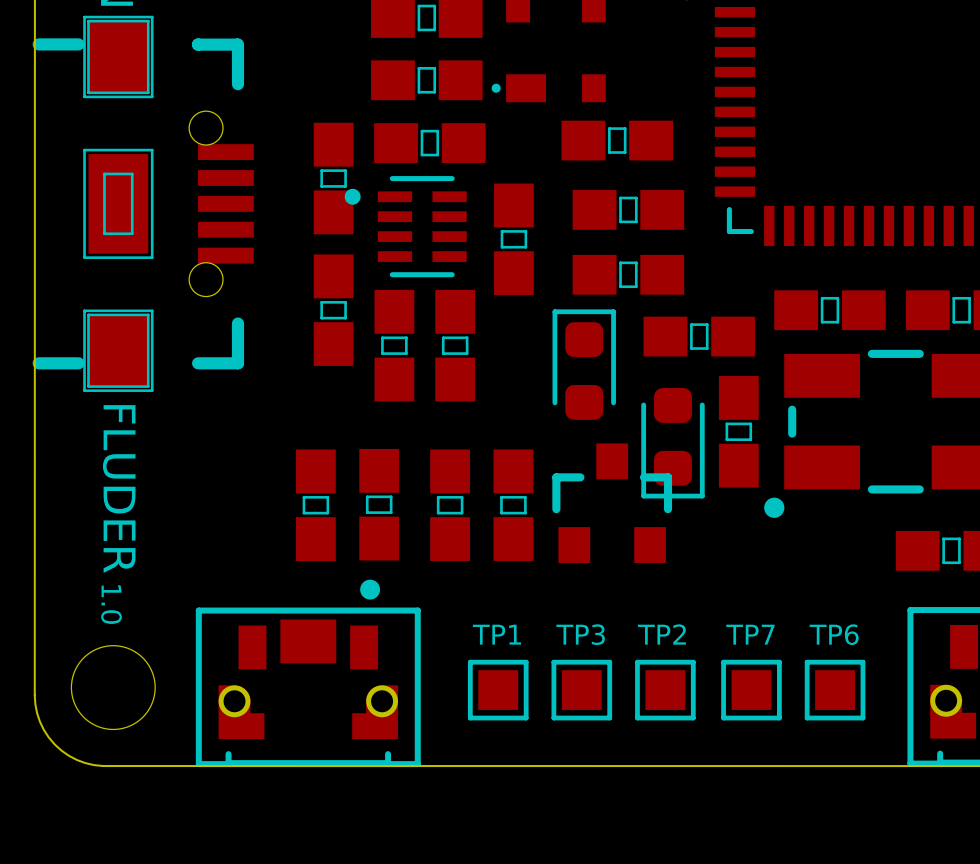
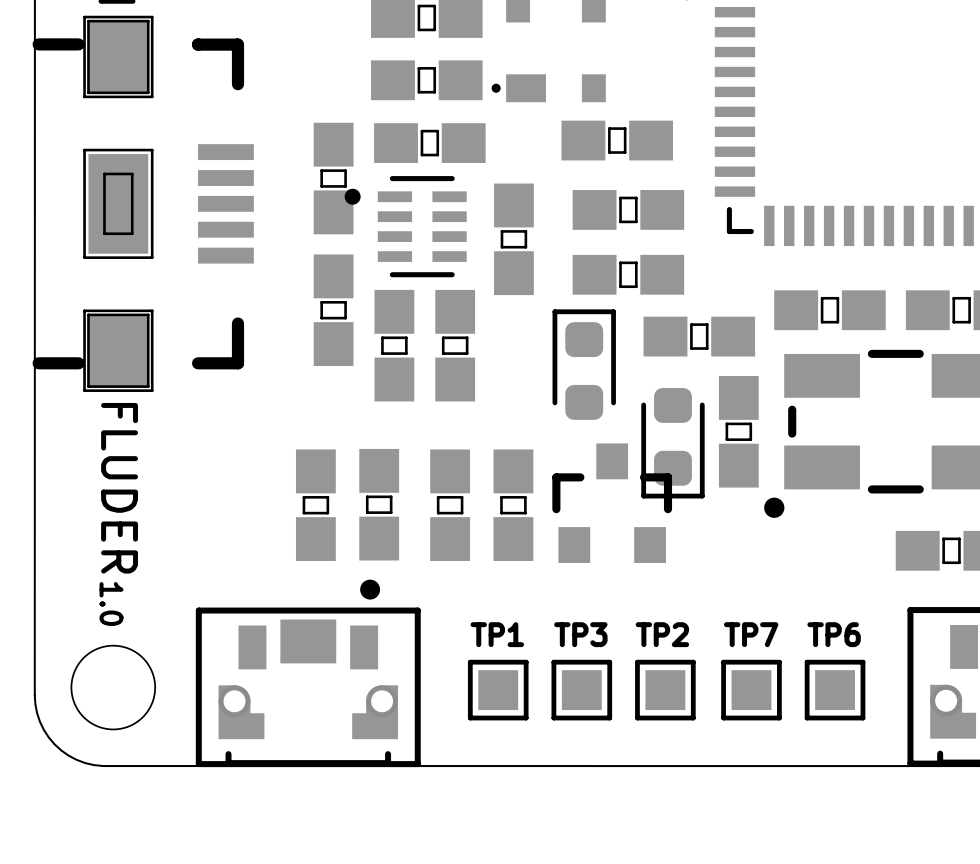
part footprint: [32, 15, 254, 392] -> [32, 15, 254, 392]

